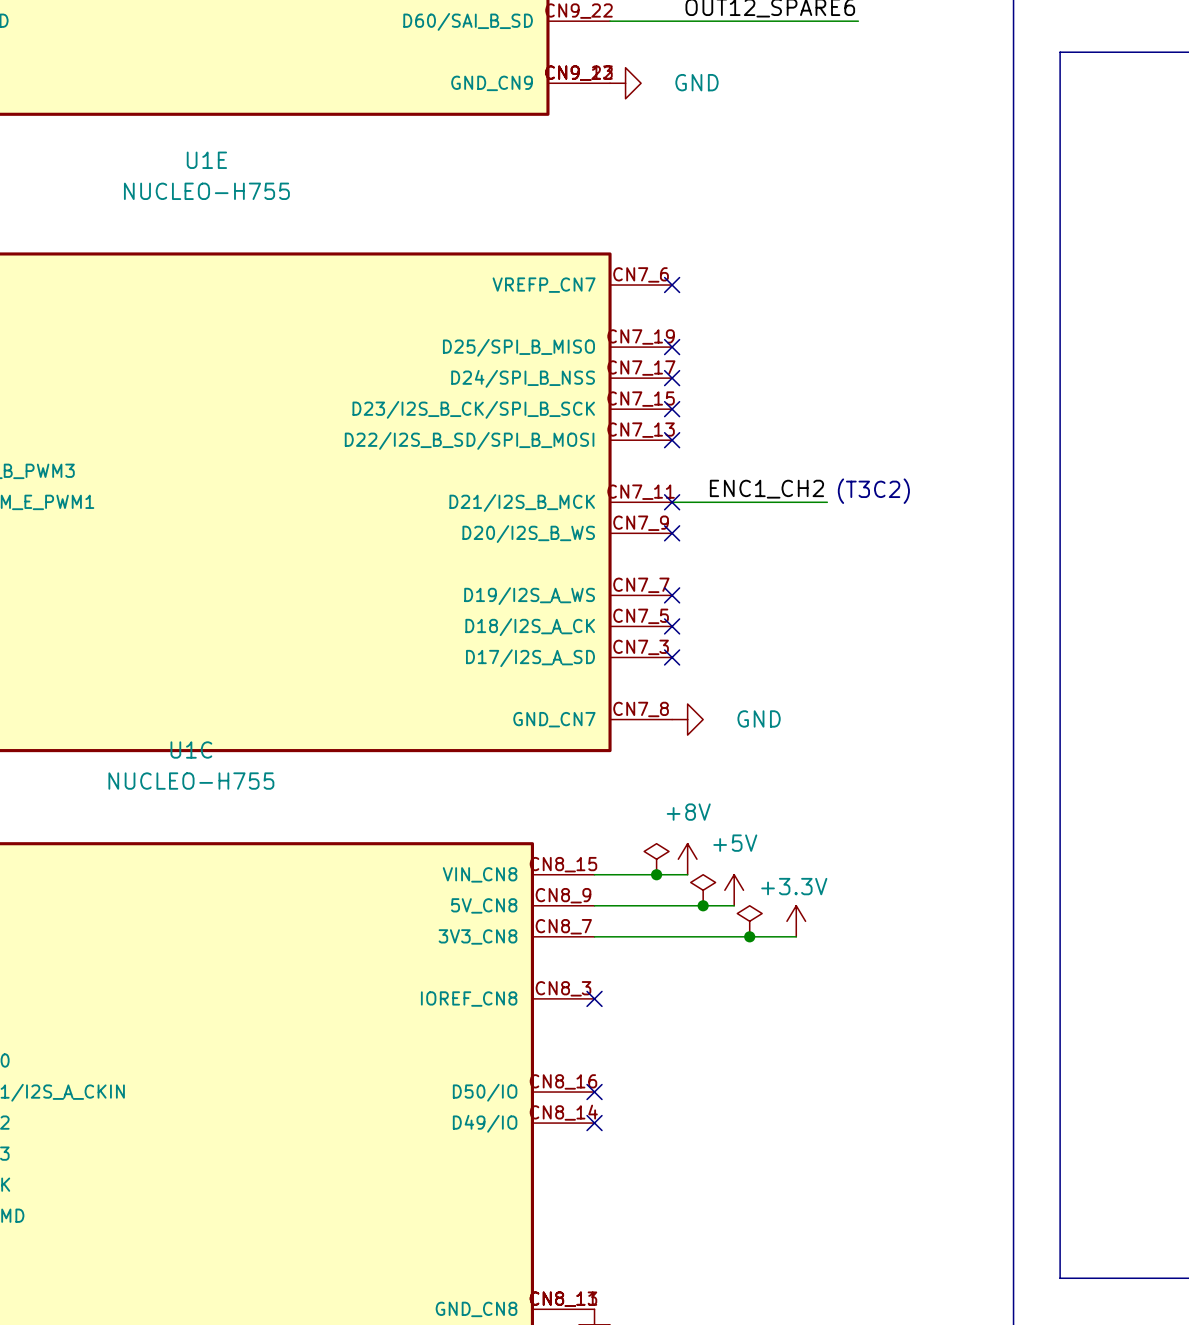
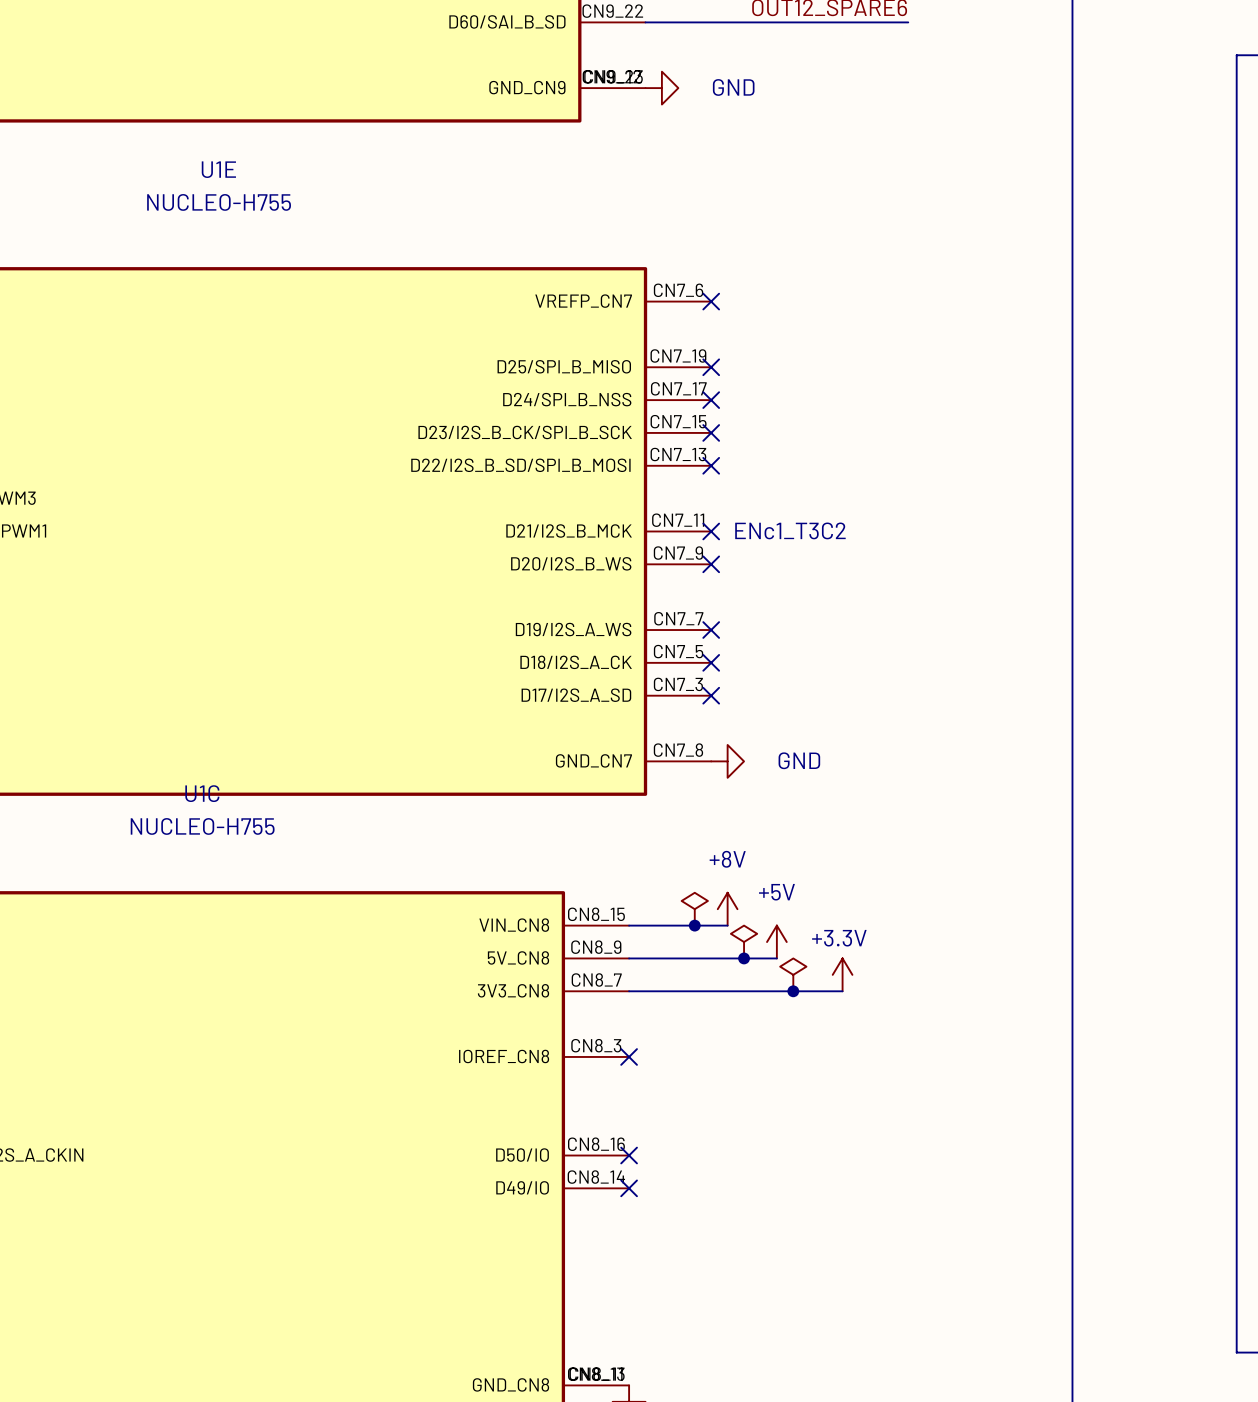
line: (1168, 52) (1060, 52) (1060, 1278) (1168, 1278) -> (1236, 55) (1236, 1352)
label: ENC1_CH2 (766, 489) -> none
text: (T3C2) (873, 491) -> none
wire: (672, 502) (827, 502) -> none
text: none -> ENc1_T3C2 (790, 530)

